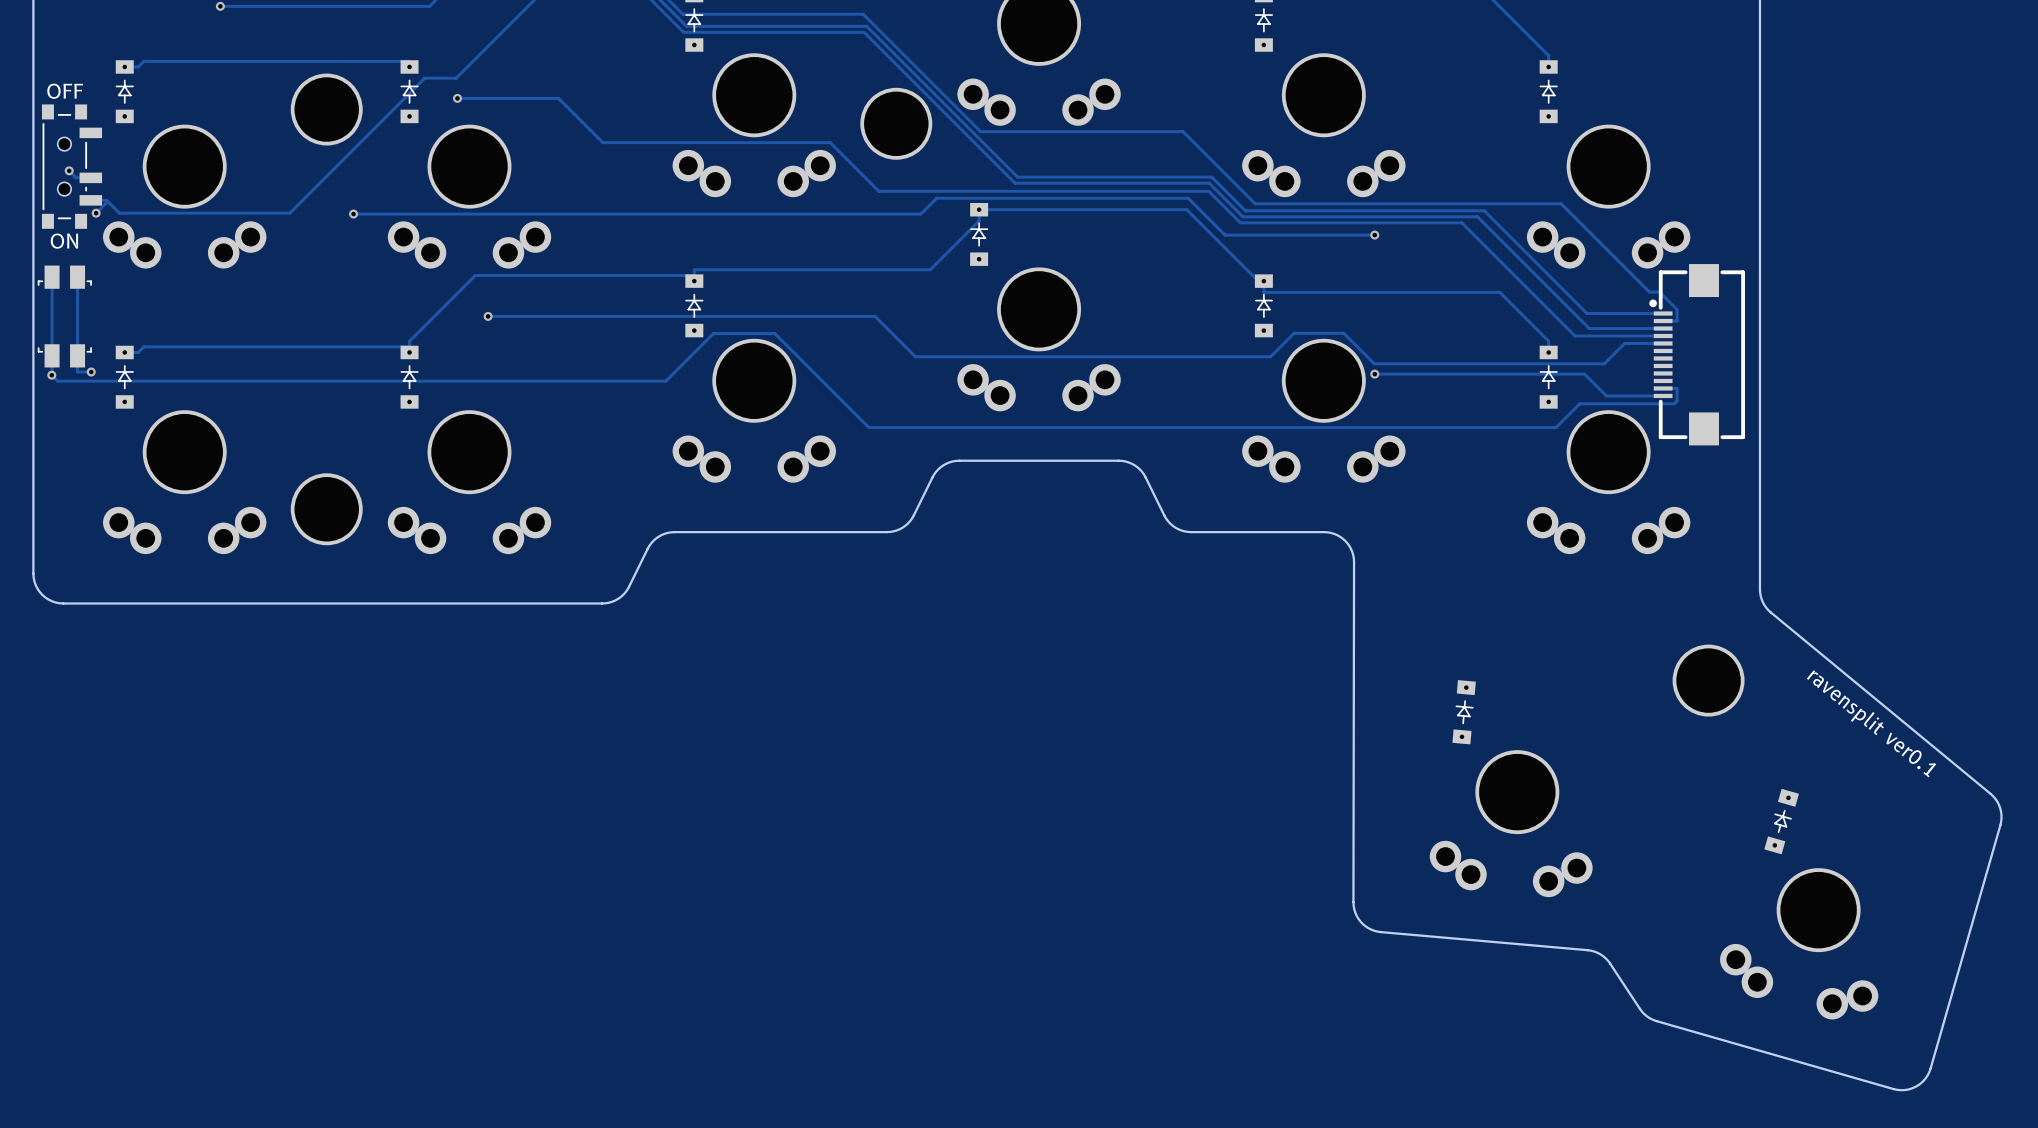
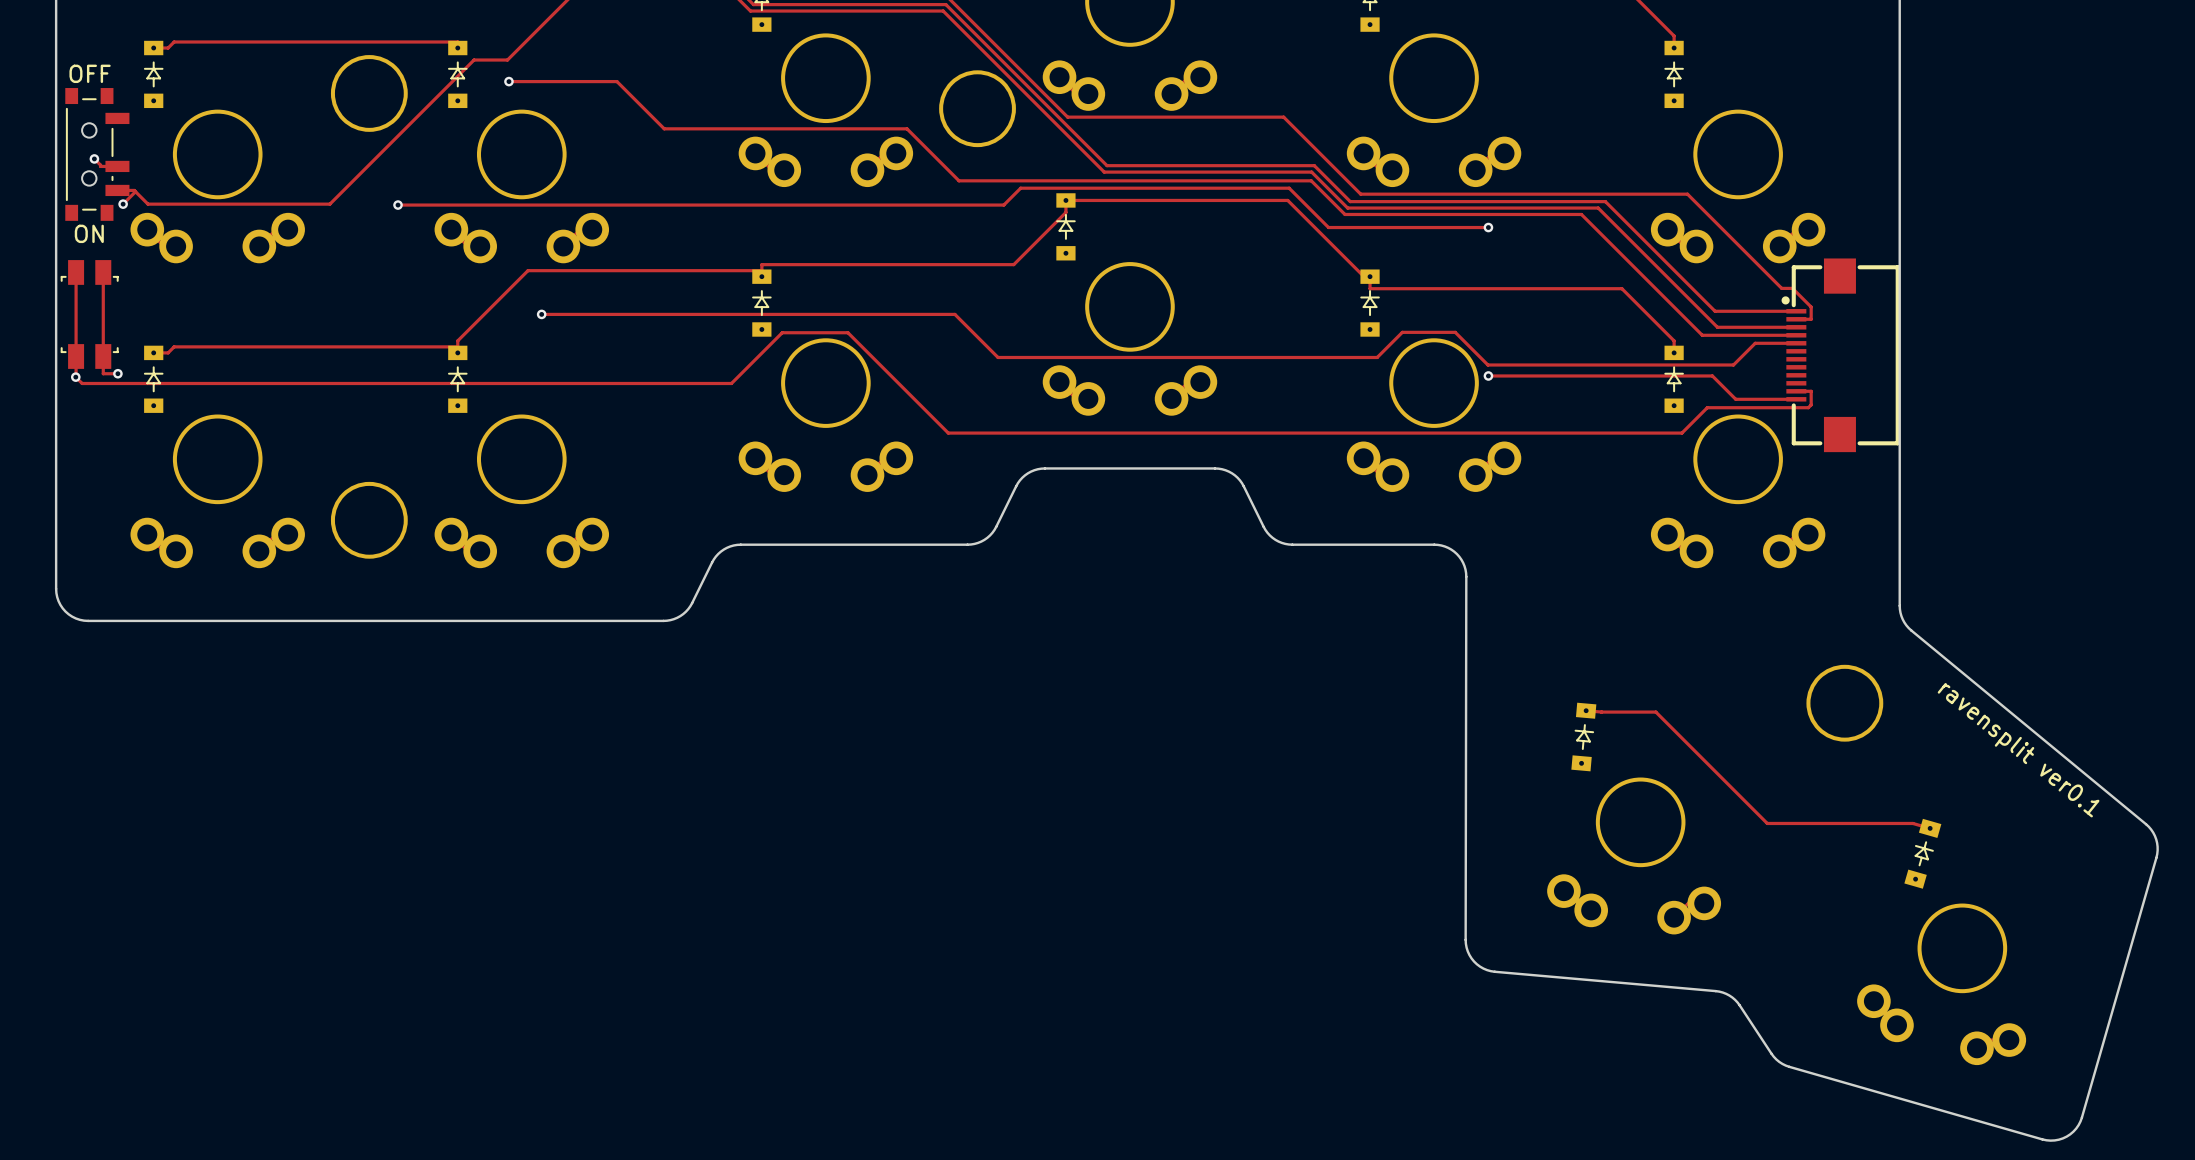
part footprint: [1649, 264, 1745, 446] -> [1781, 258, 1900, 453]
track: none -> (1586, 710) (1655, 712) (1767, 823) (1912, 823) (1930, 828)

